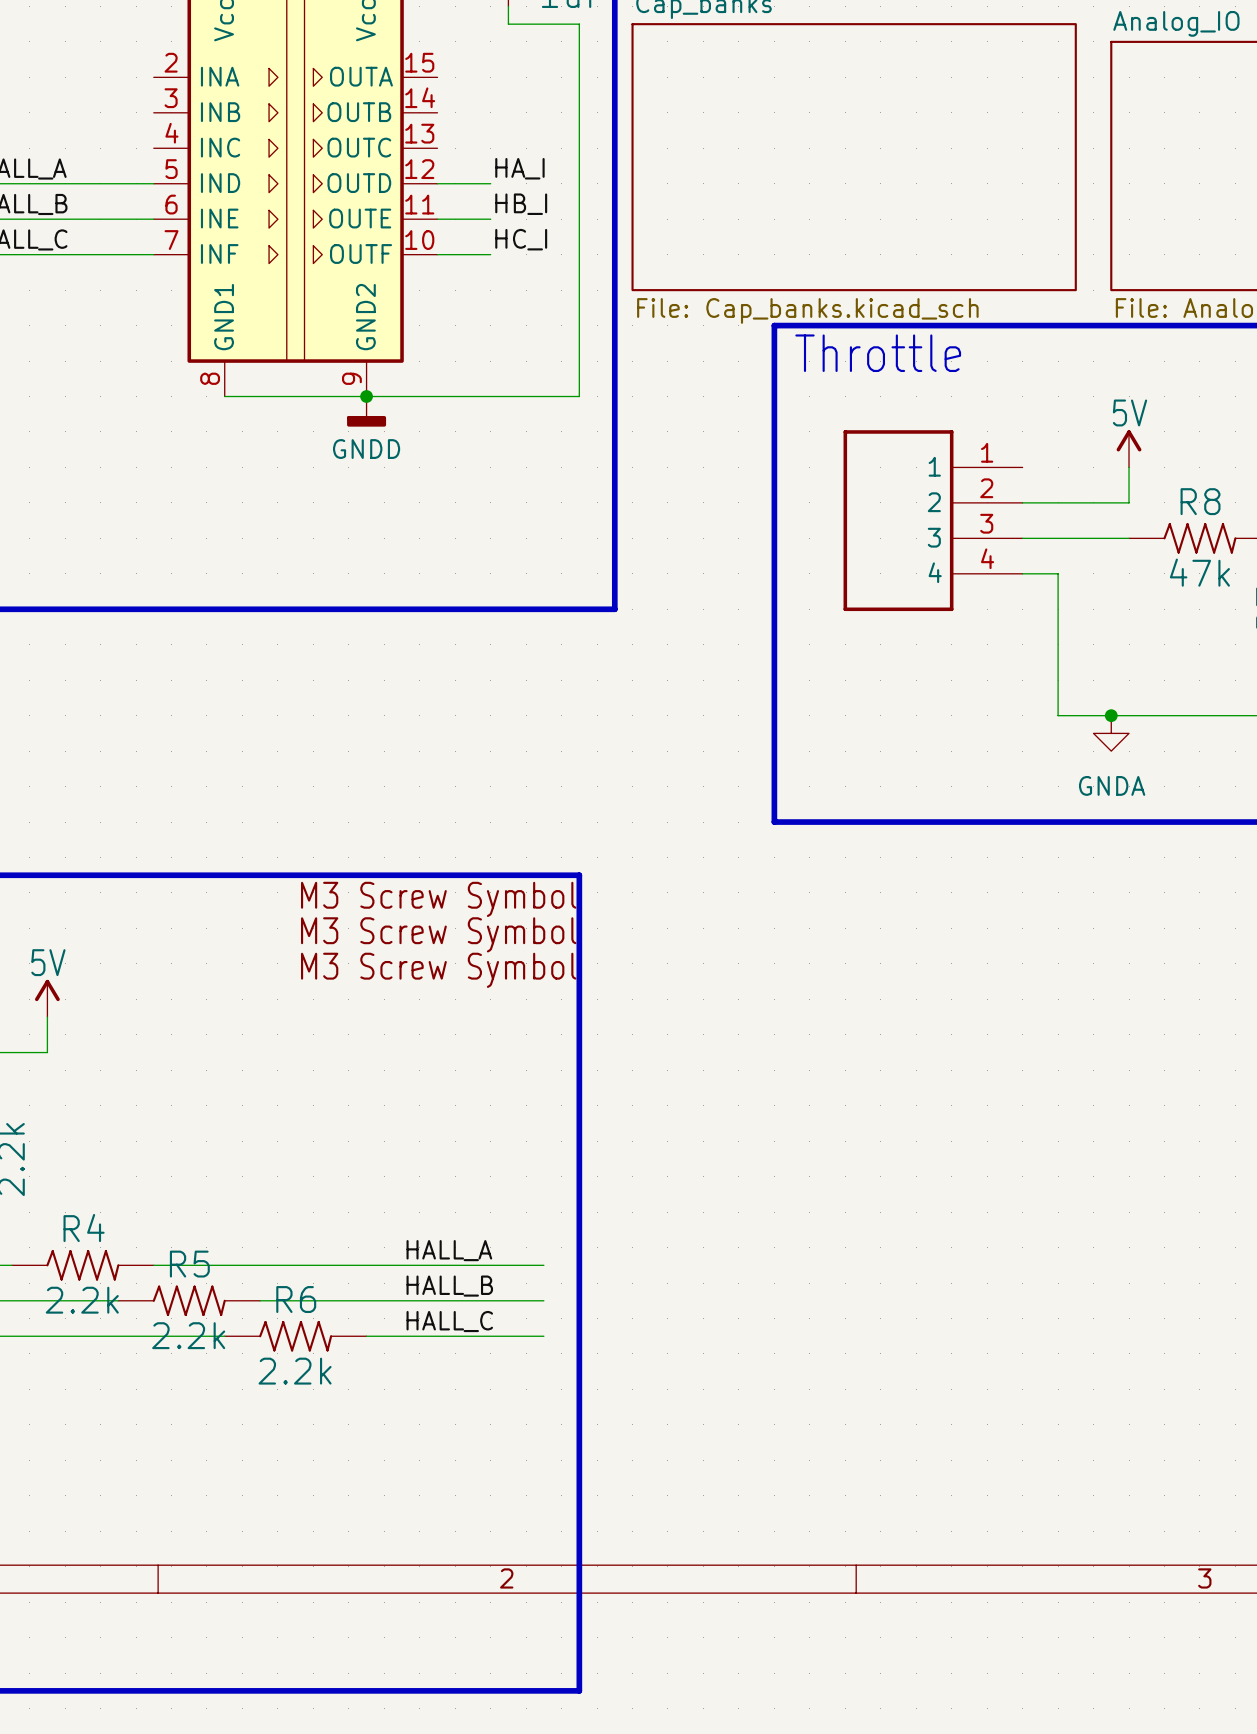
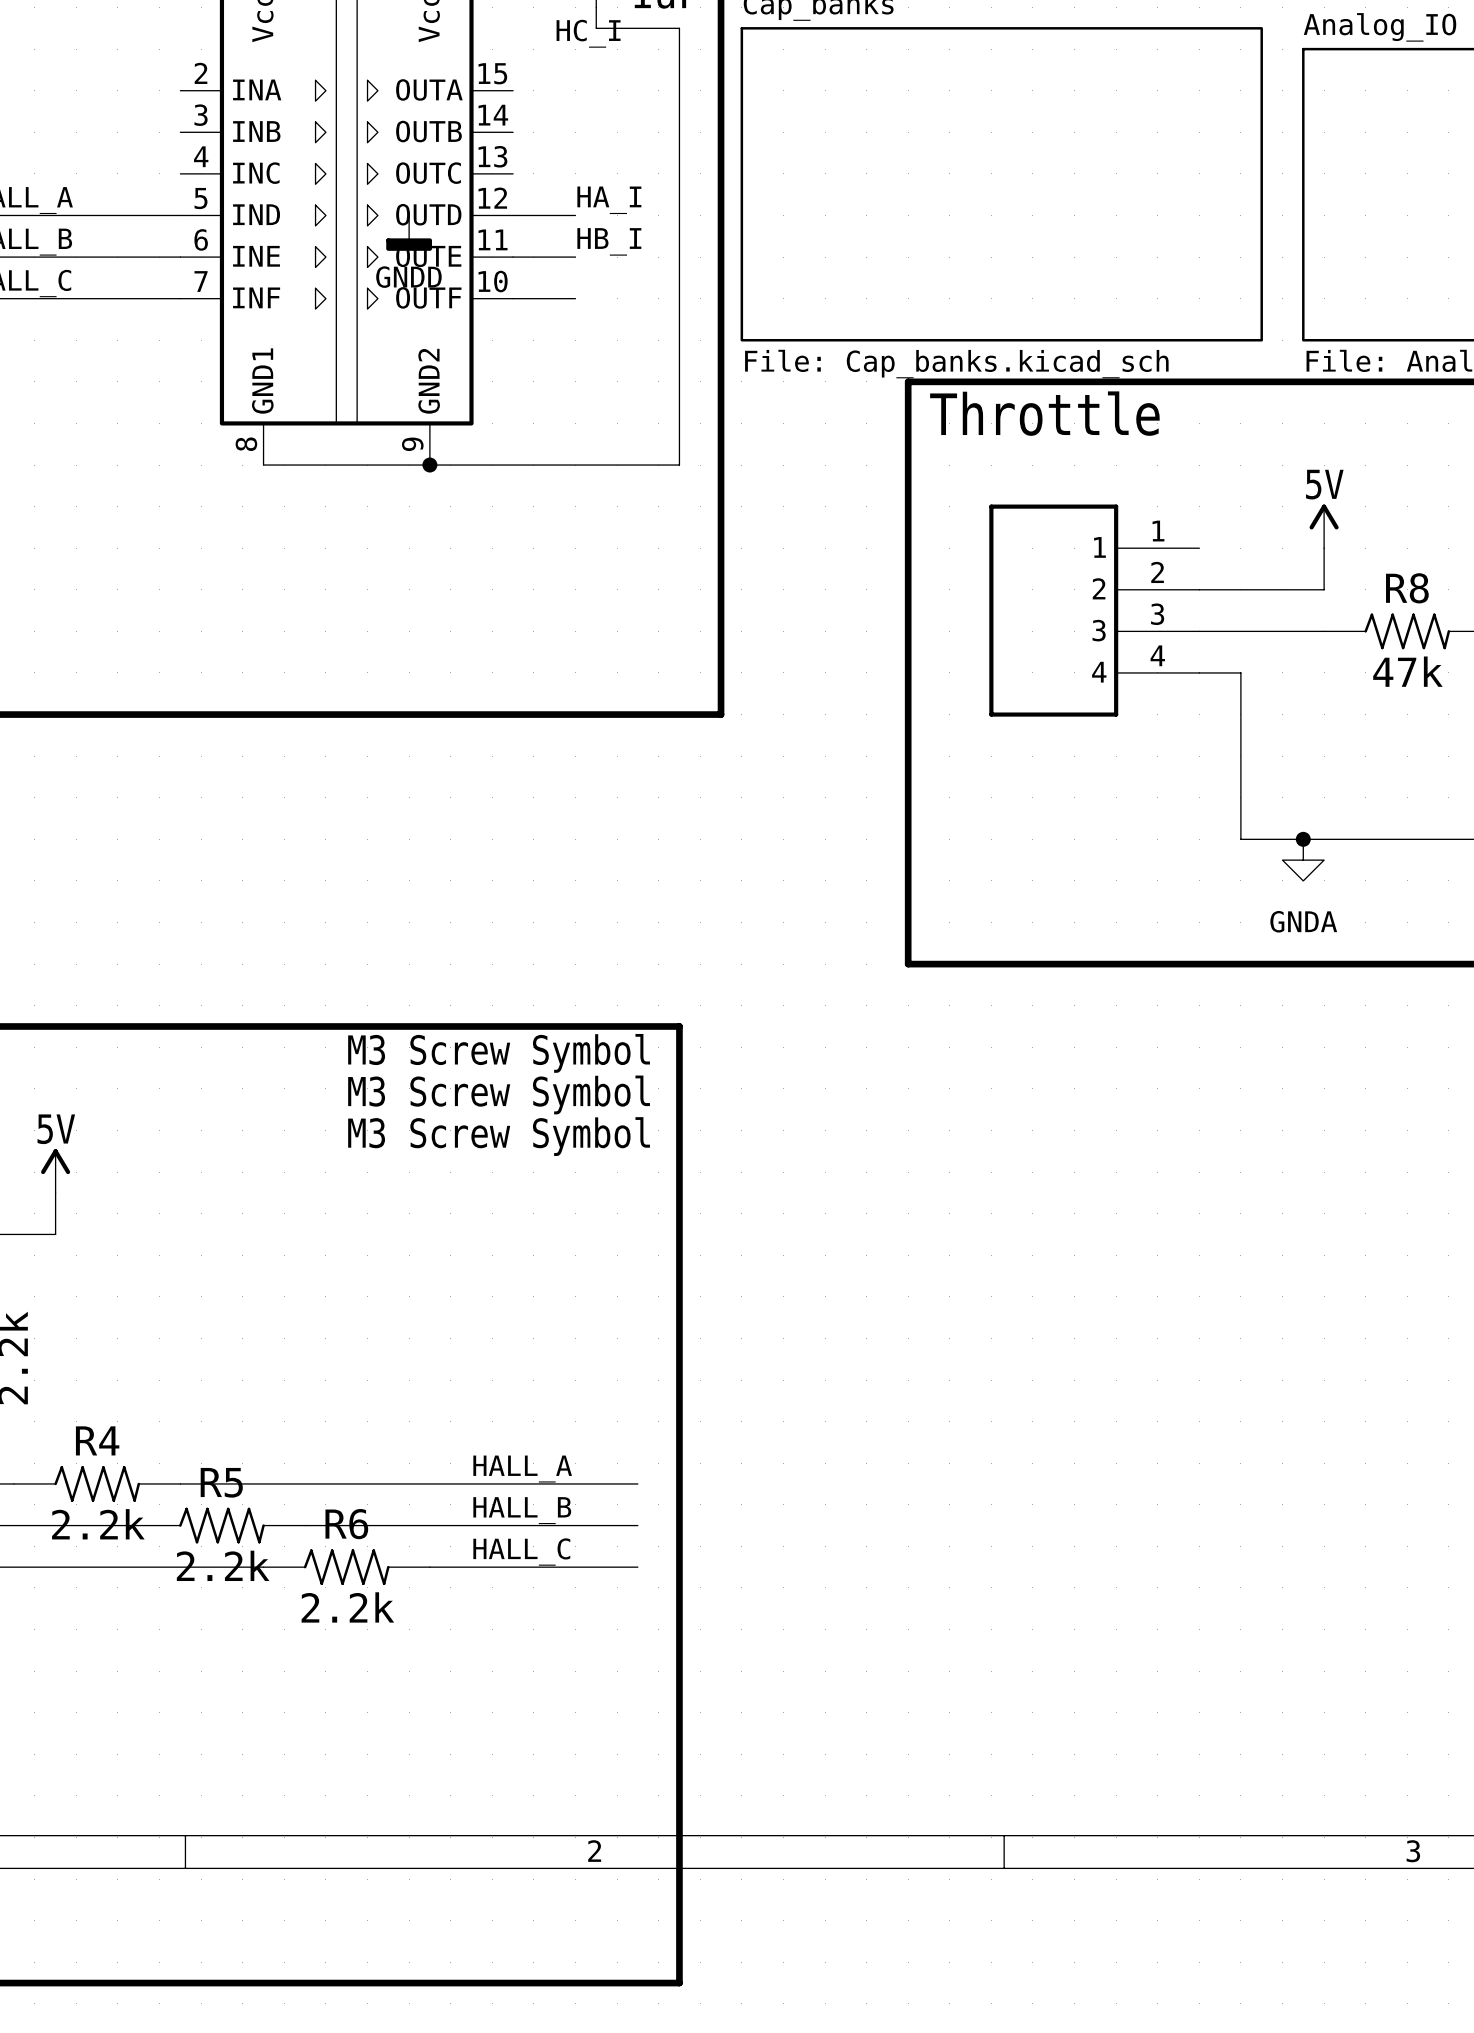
label position: HC_I (521, 239) -> HC_I (588, 33)
power symbol position: GNDD (366, 411) -> GNDD (409, 233)

